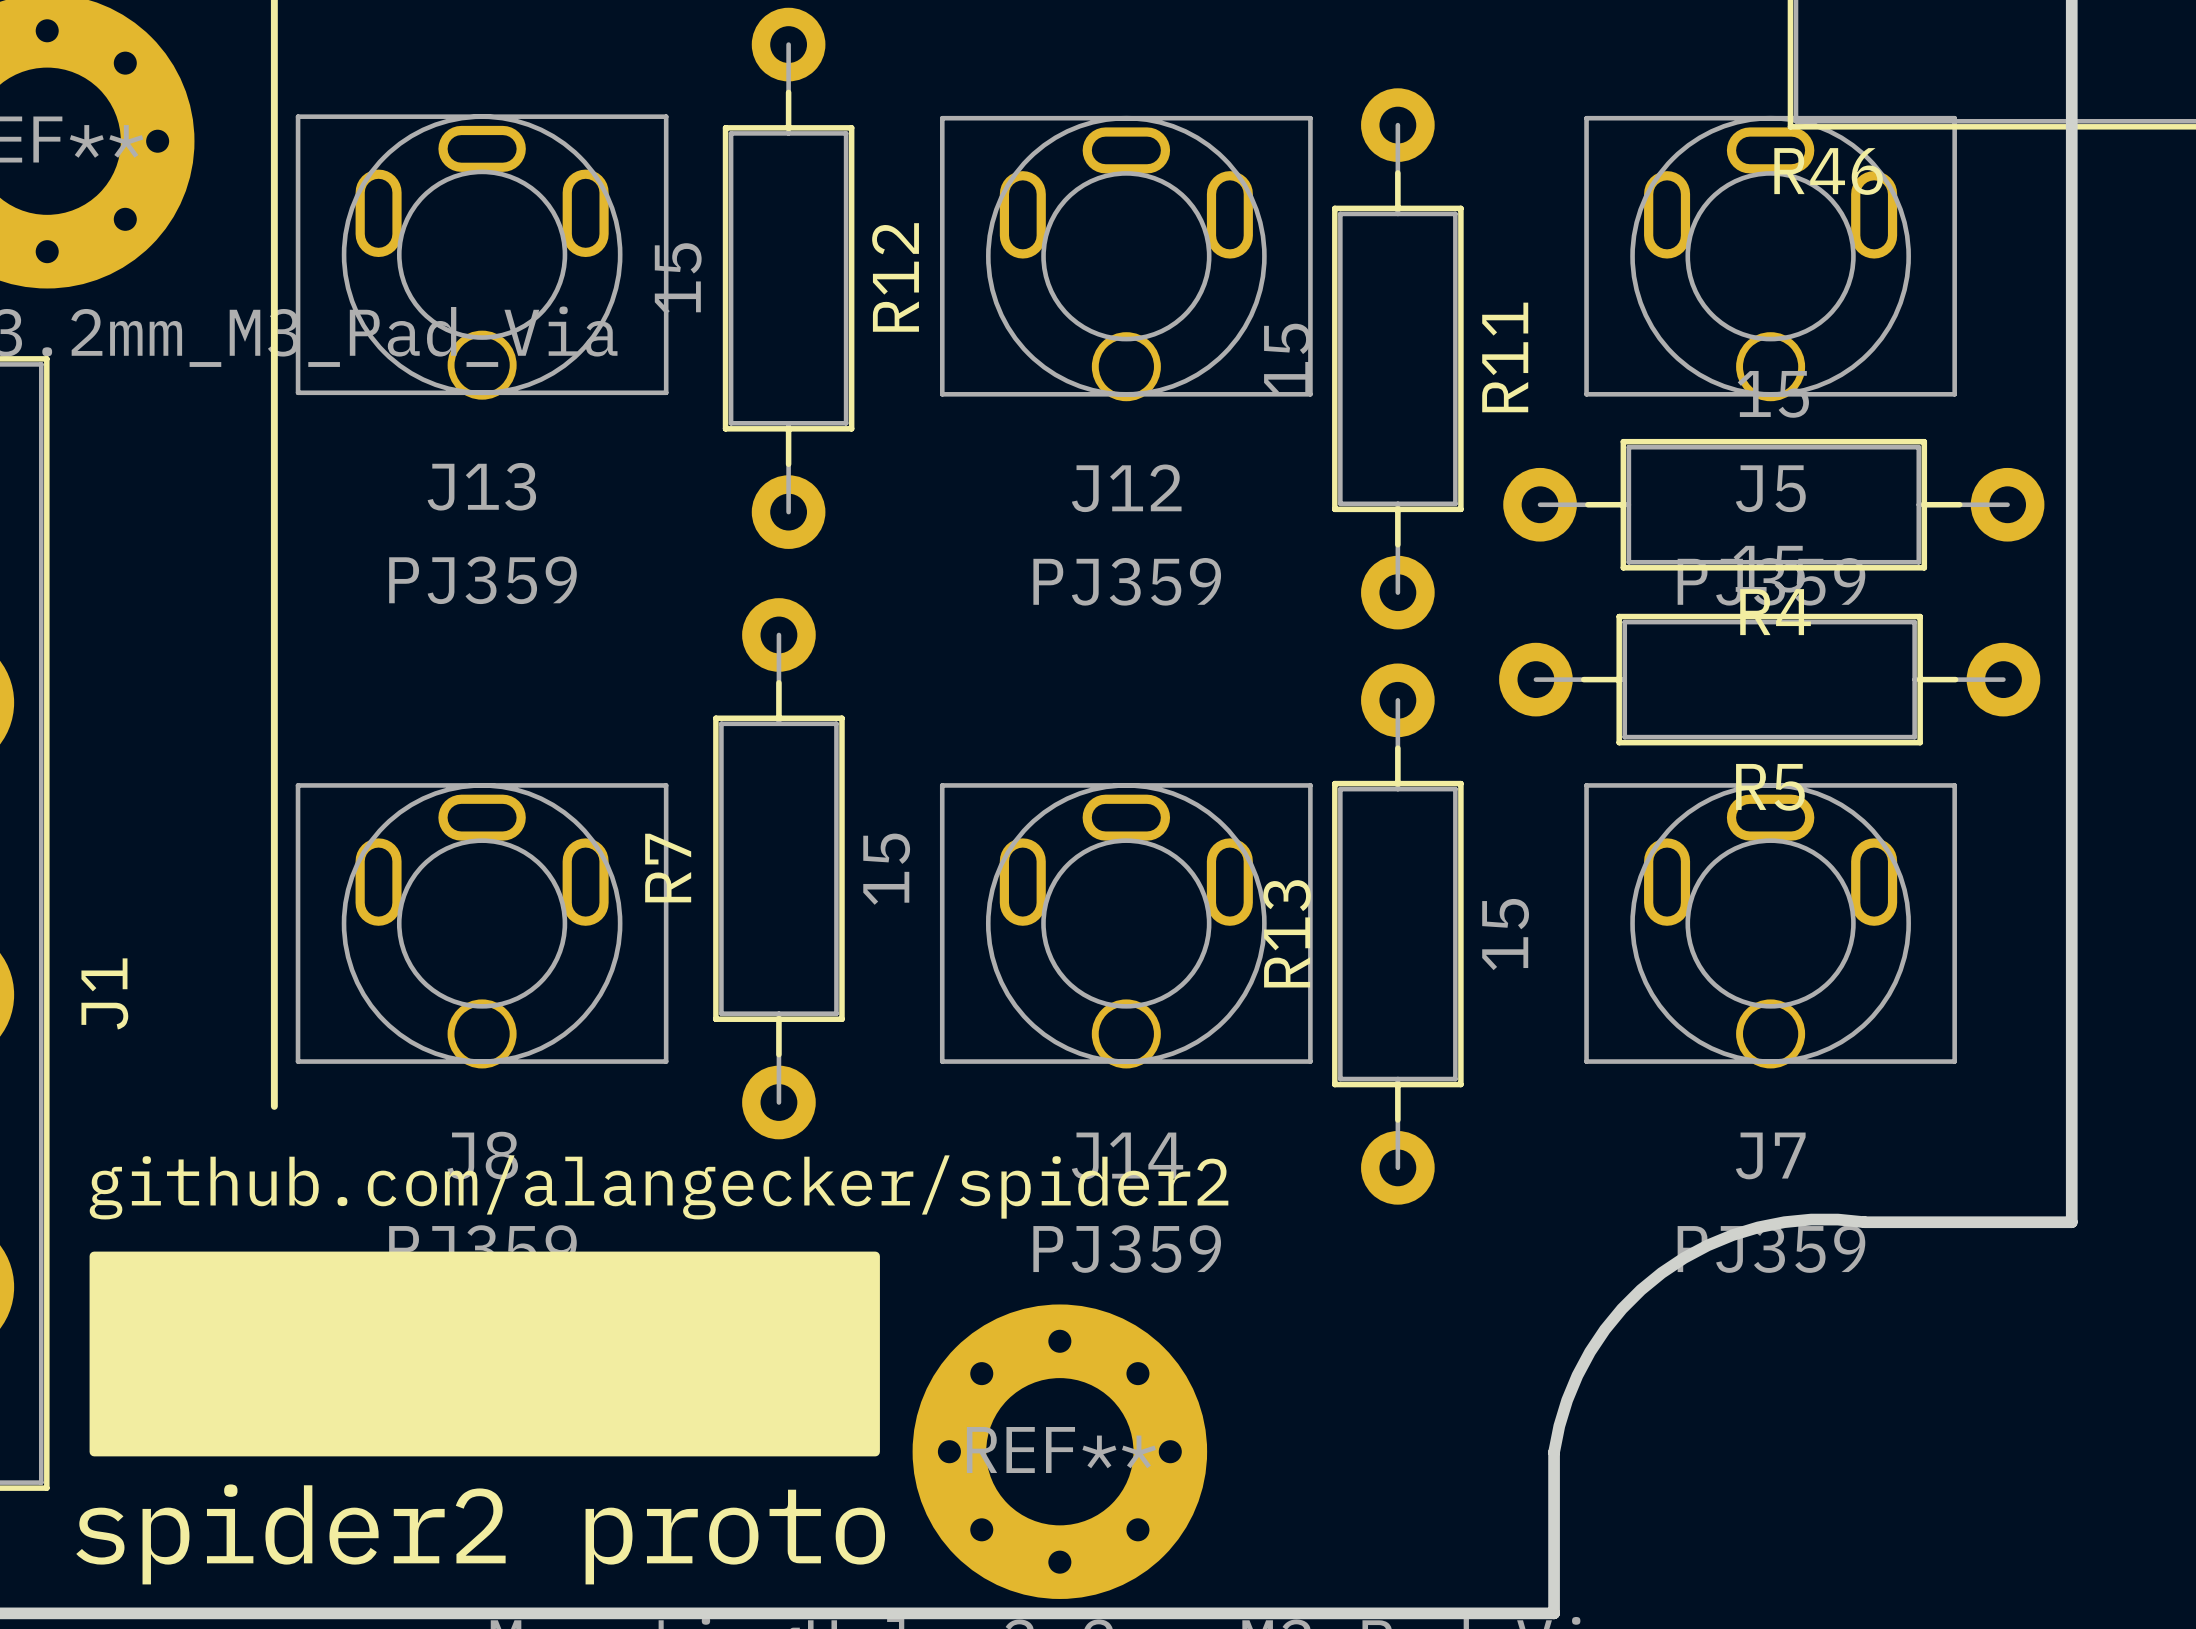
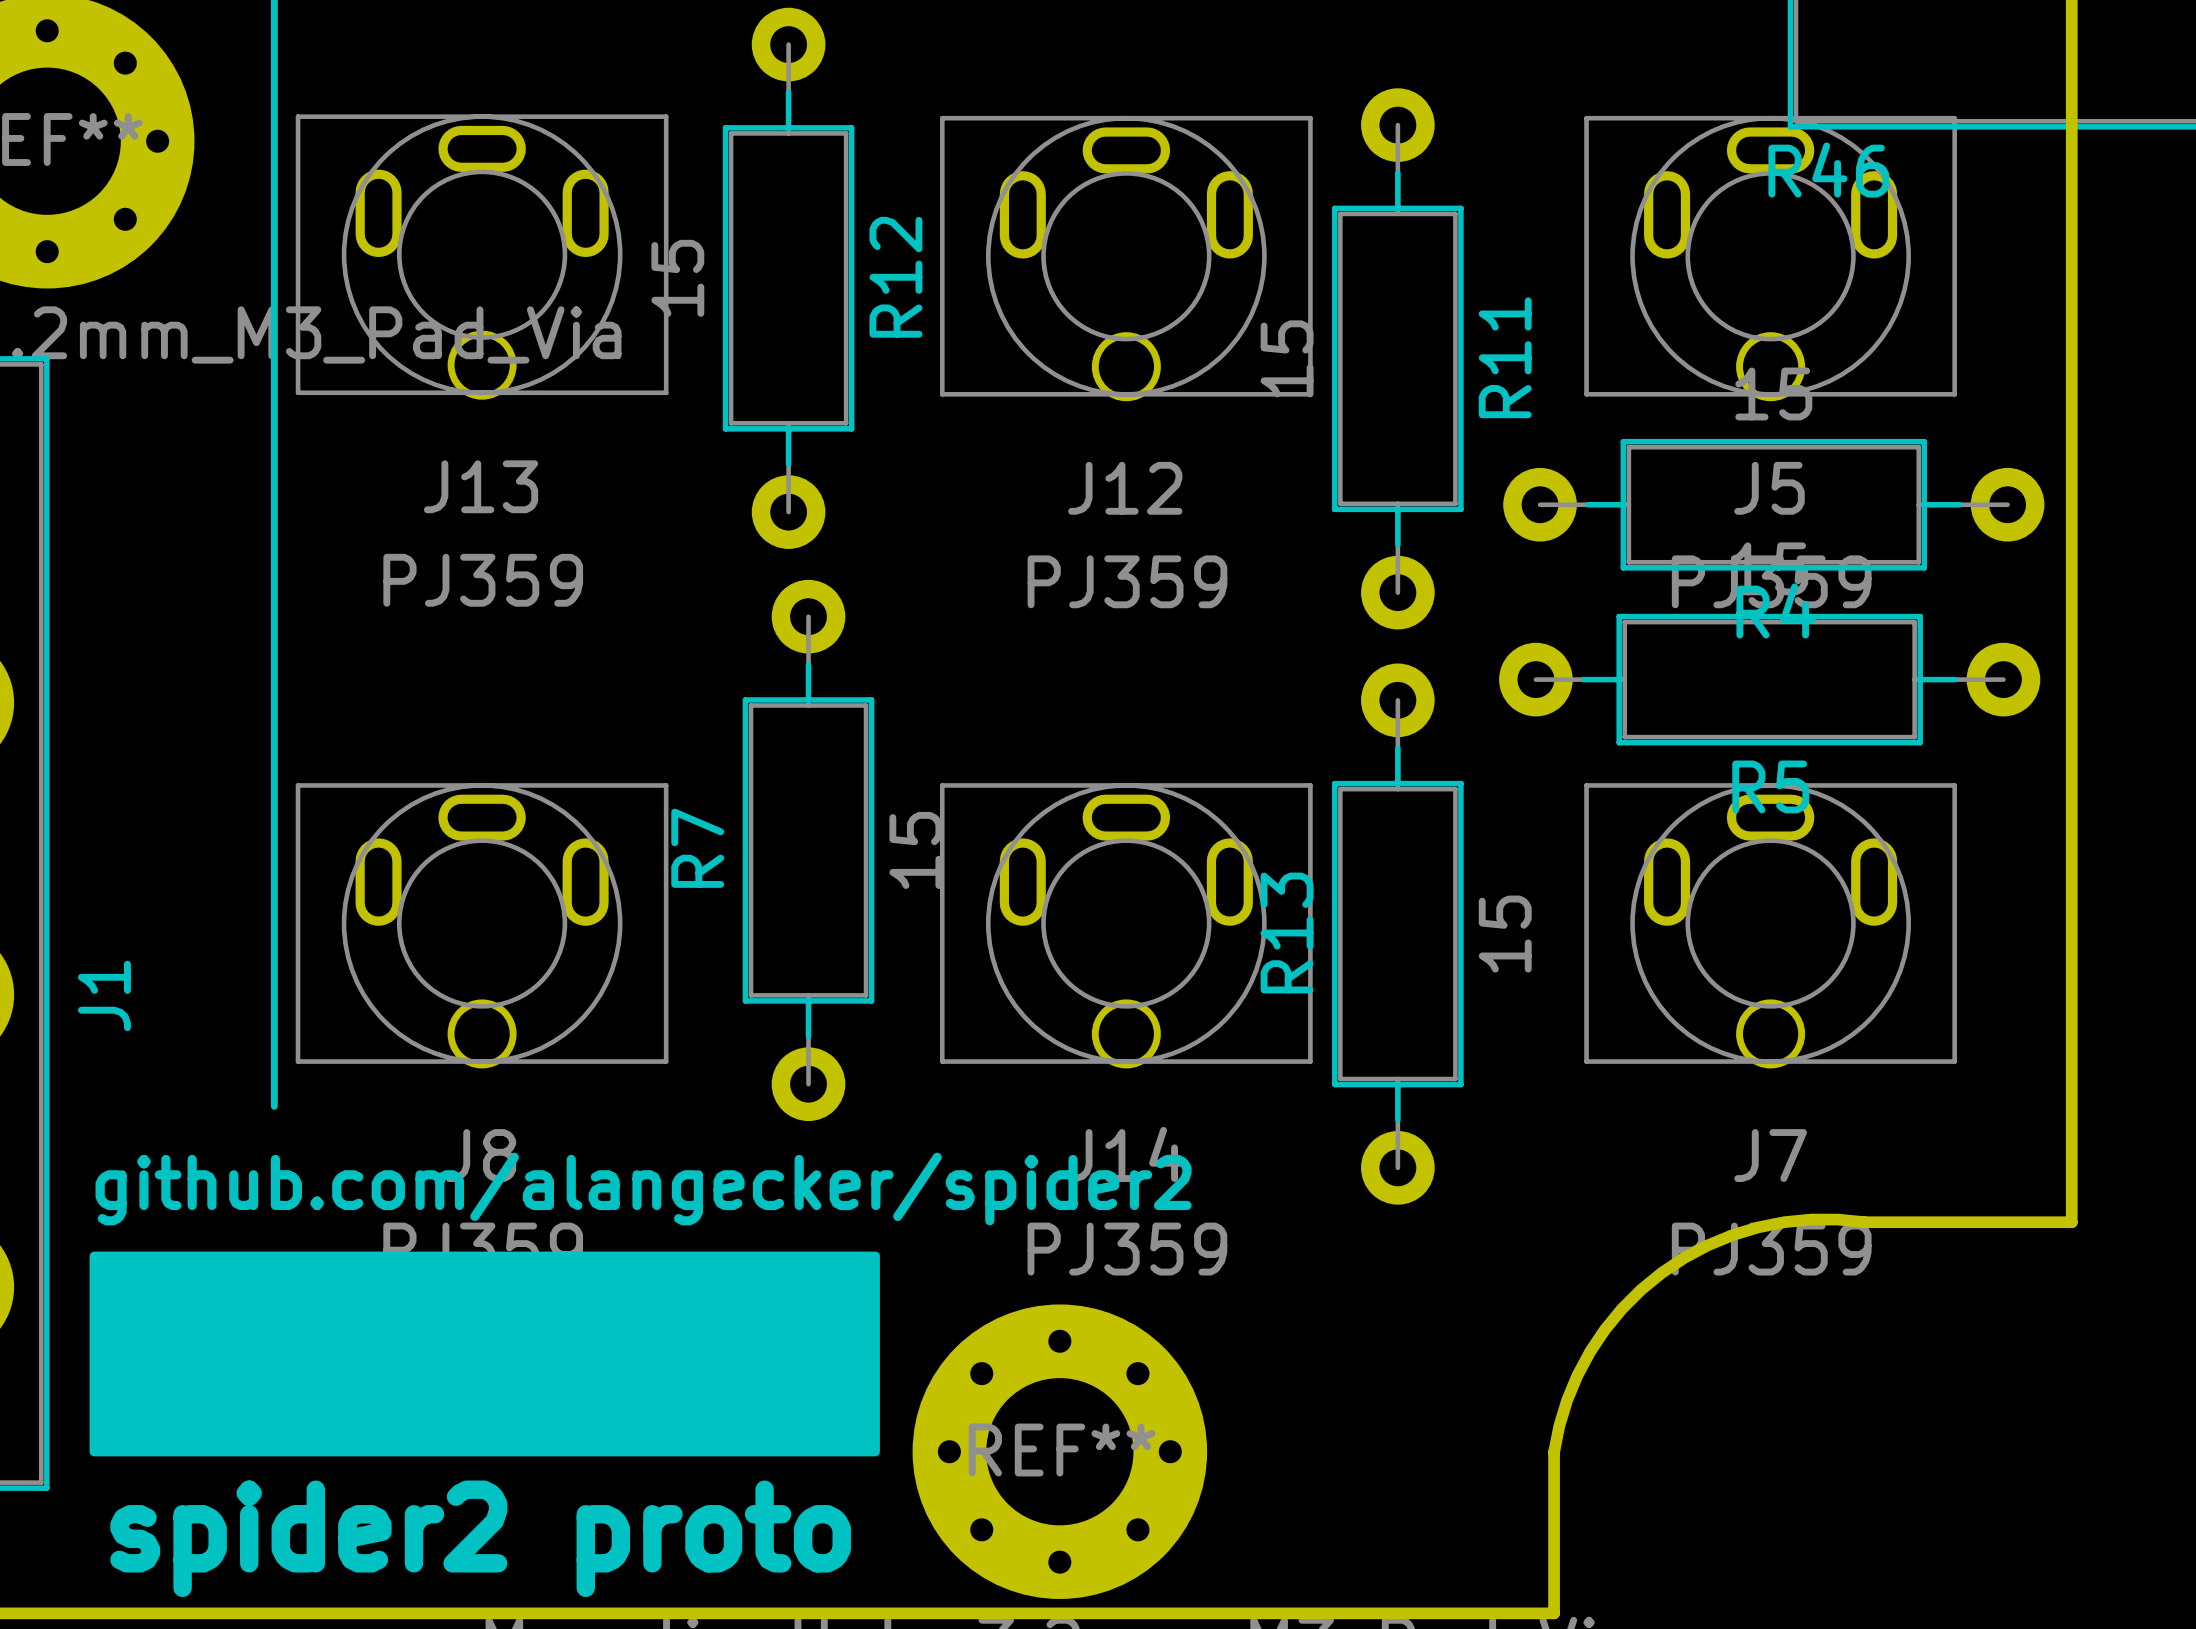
R7 position: (778, 868) -> (808, 850)

